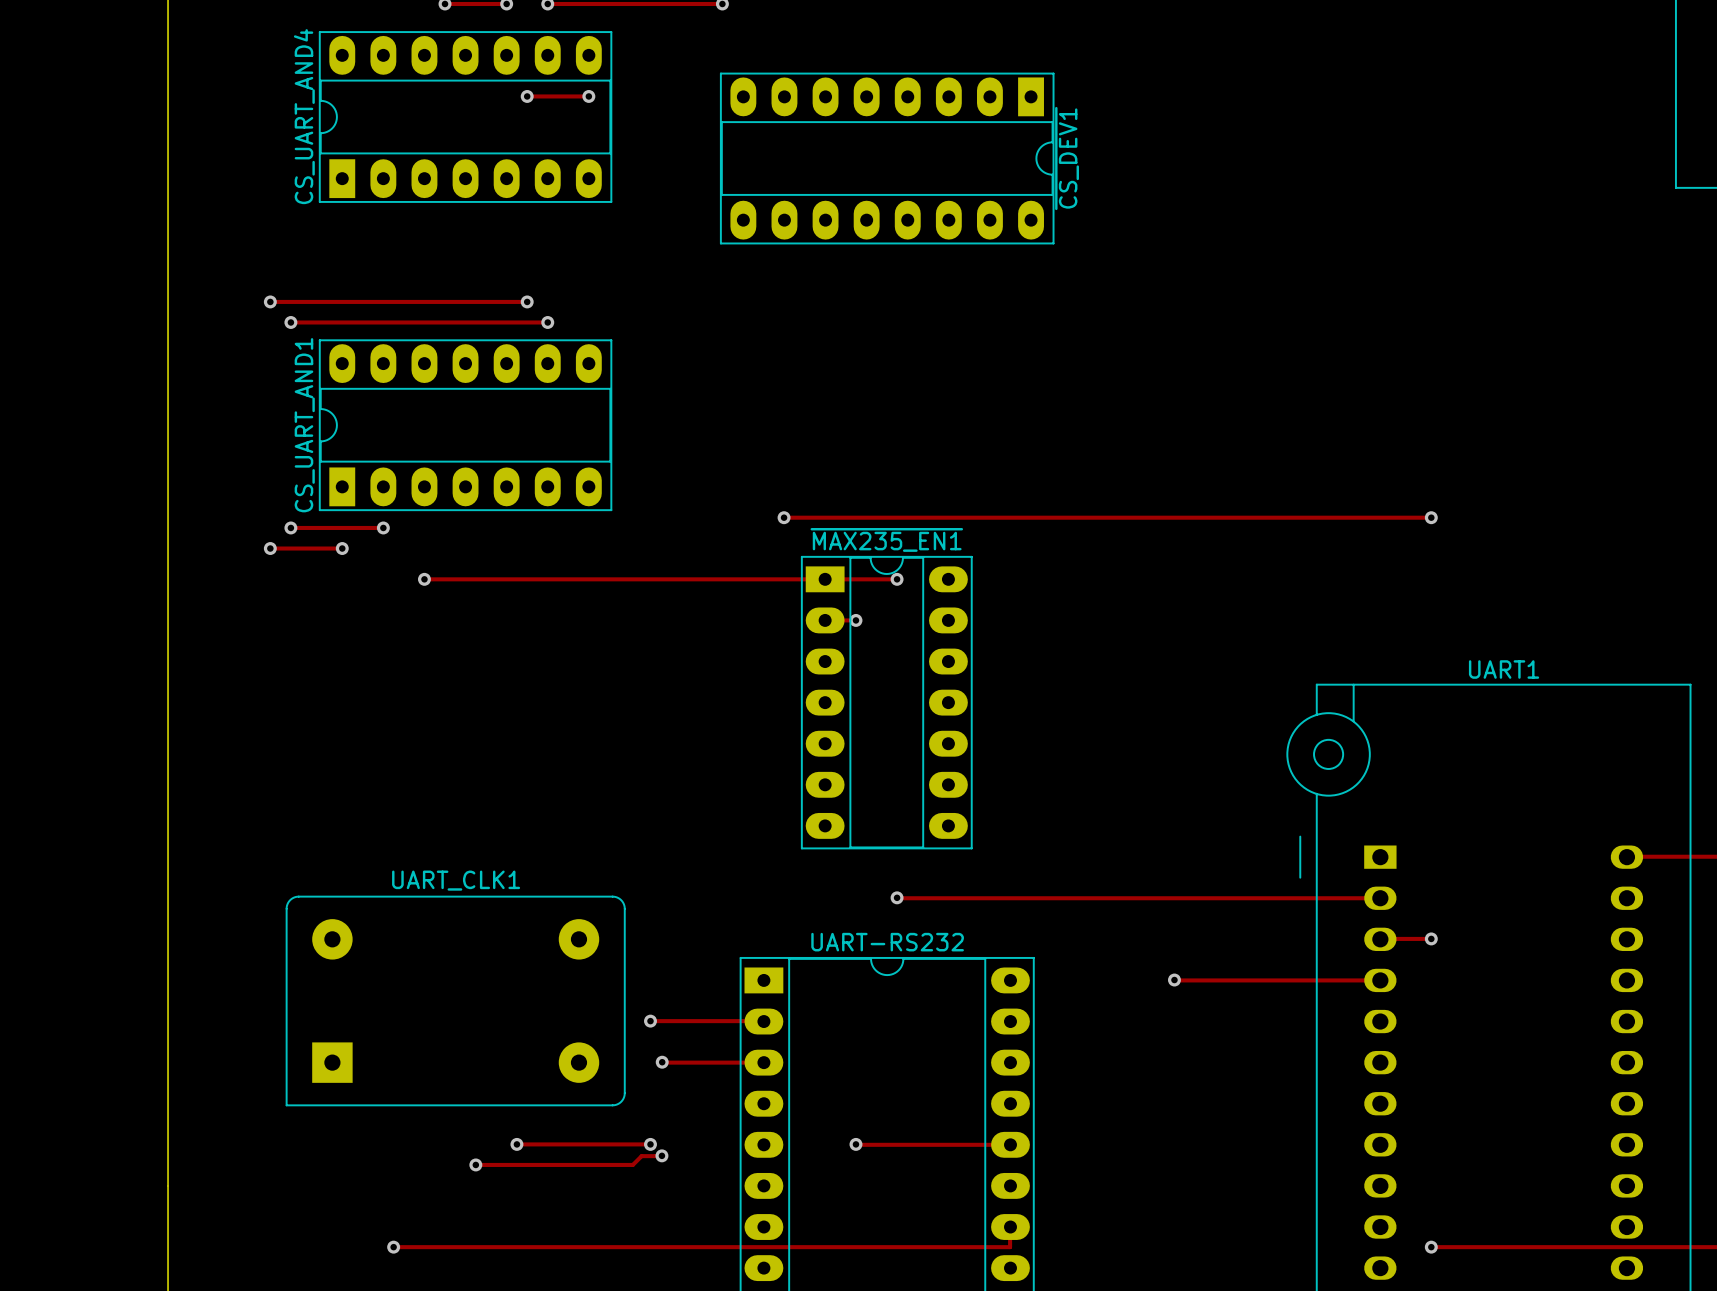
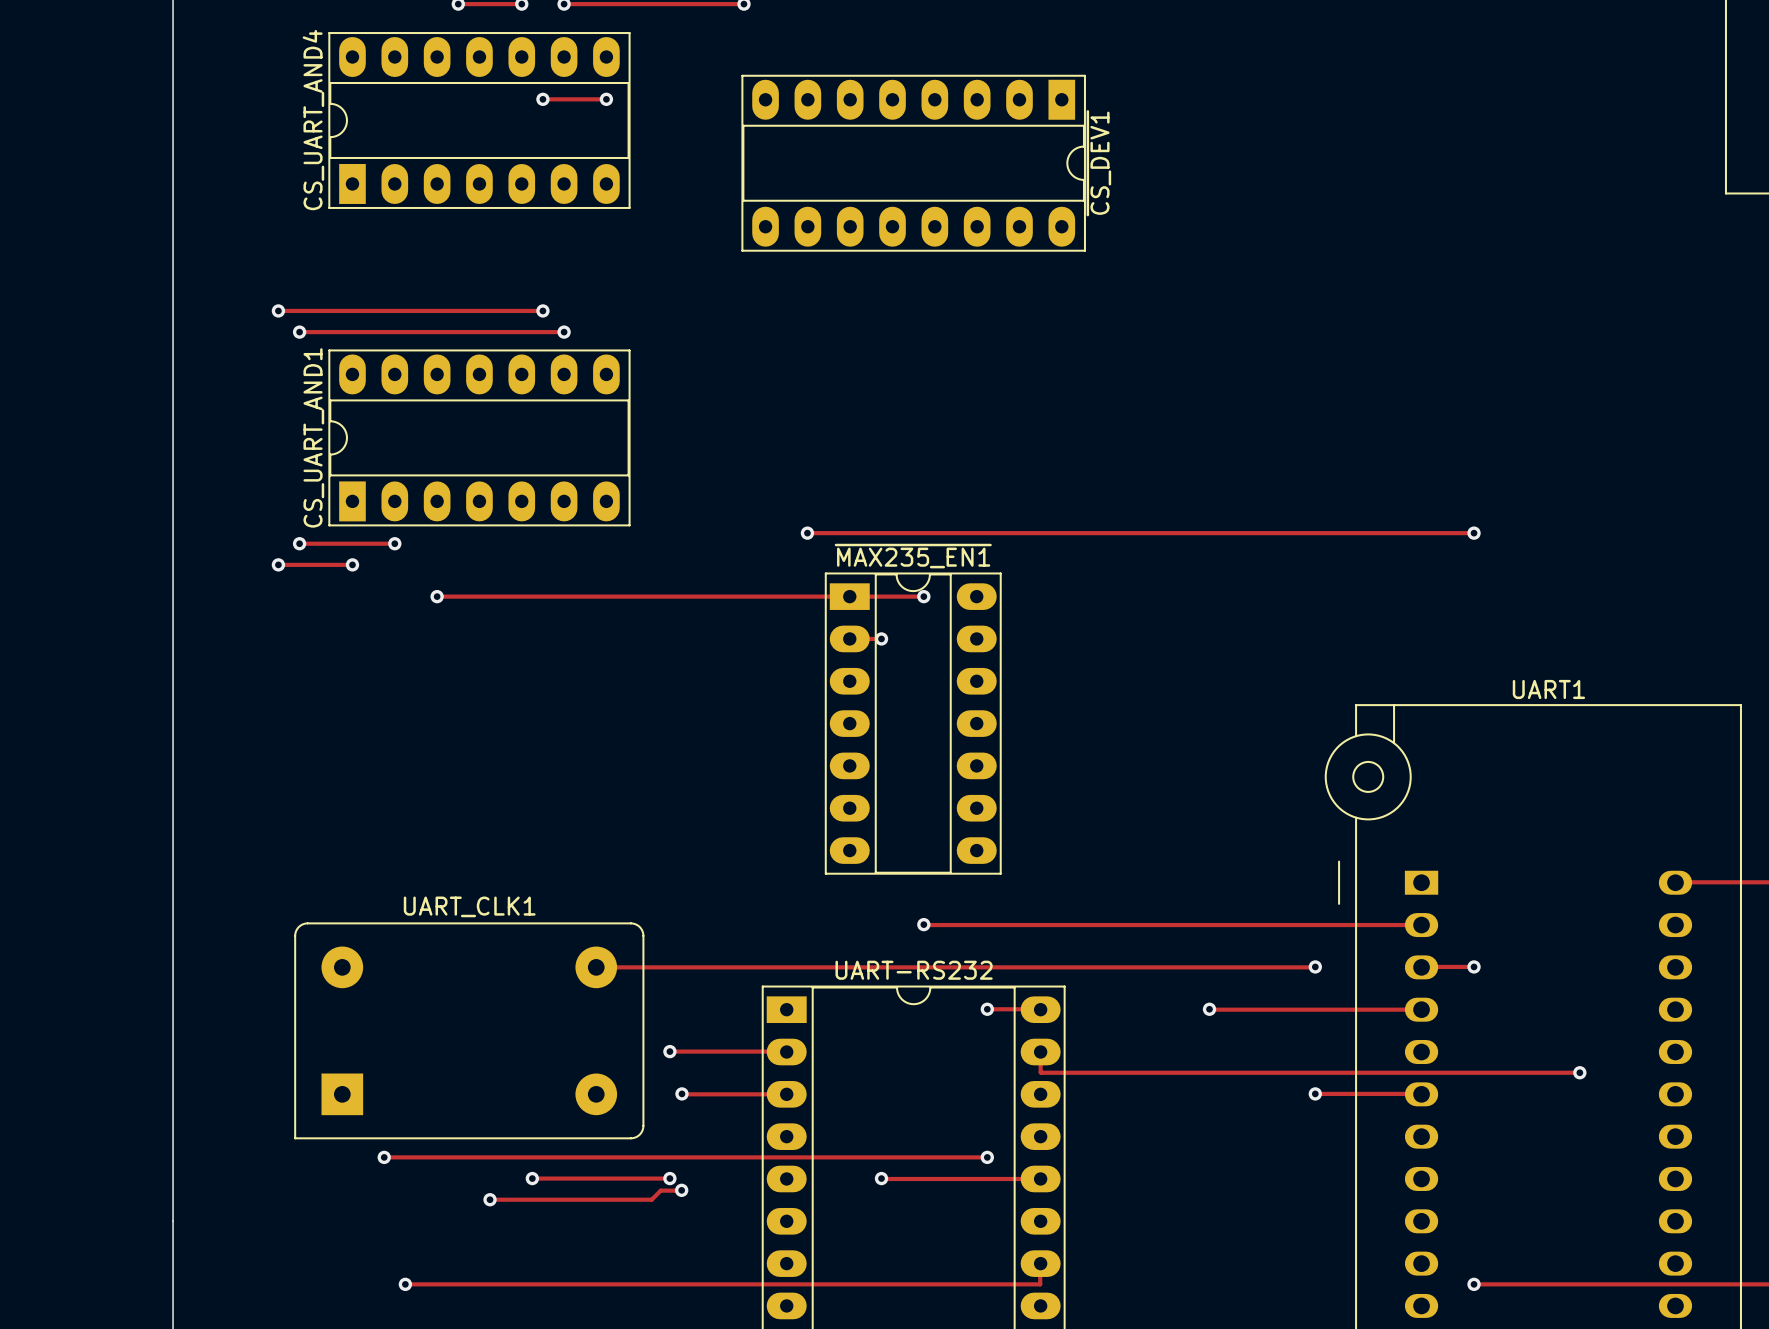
track: none -> (1315, 966) (596, 967)
via: none -> (1315, 966)
track: none -> (987, 1009) (1040, 1009)
via: none -> (987, 1009)
track: none -> (1040, 1052) (1041, 1072) (1579, 1072)
via: none -> (1579, 1072)
track: none -> (1315, 1093) (1421, 1094)
via: none -> (1315, 1093)
track: none -> (384, 1157) (987, 1157)
via: none -> (384, 1157)
via: none -> (987, 1157)

